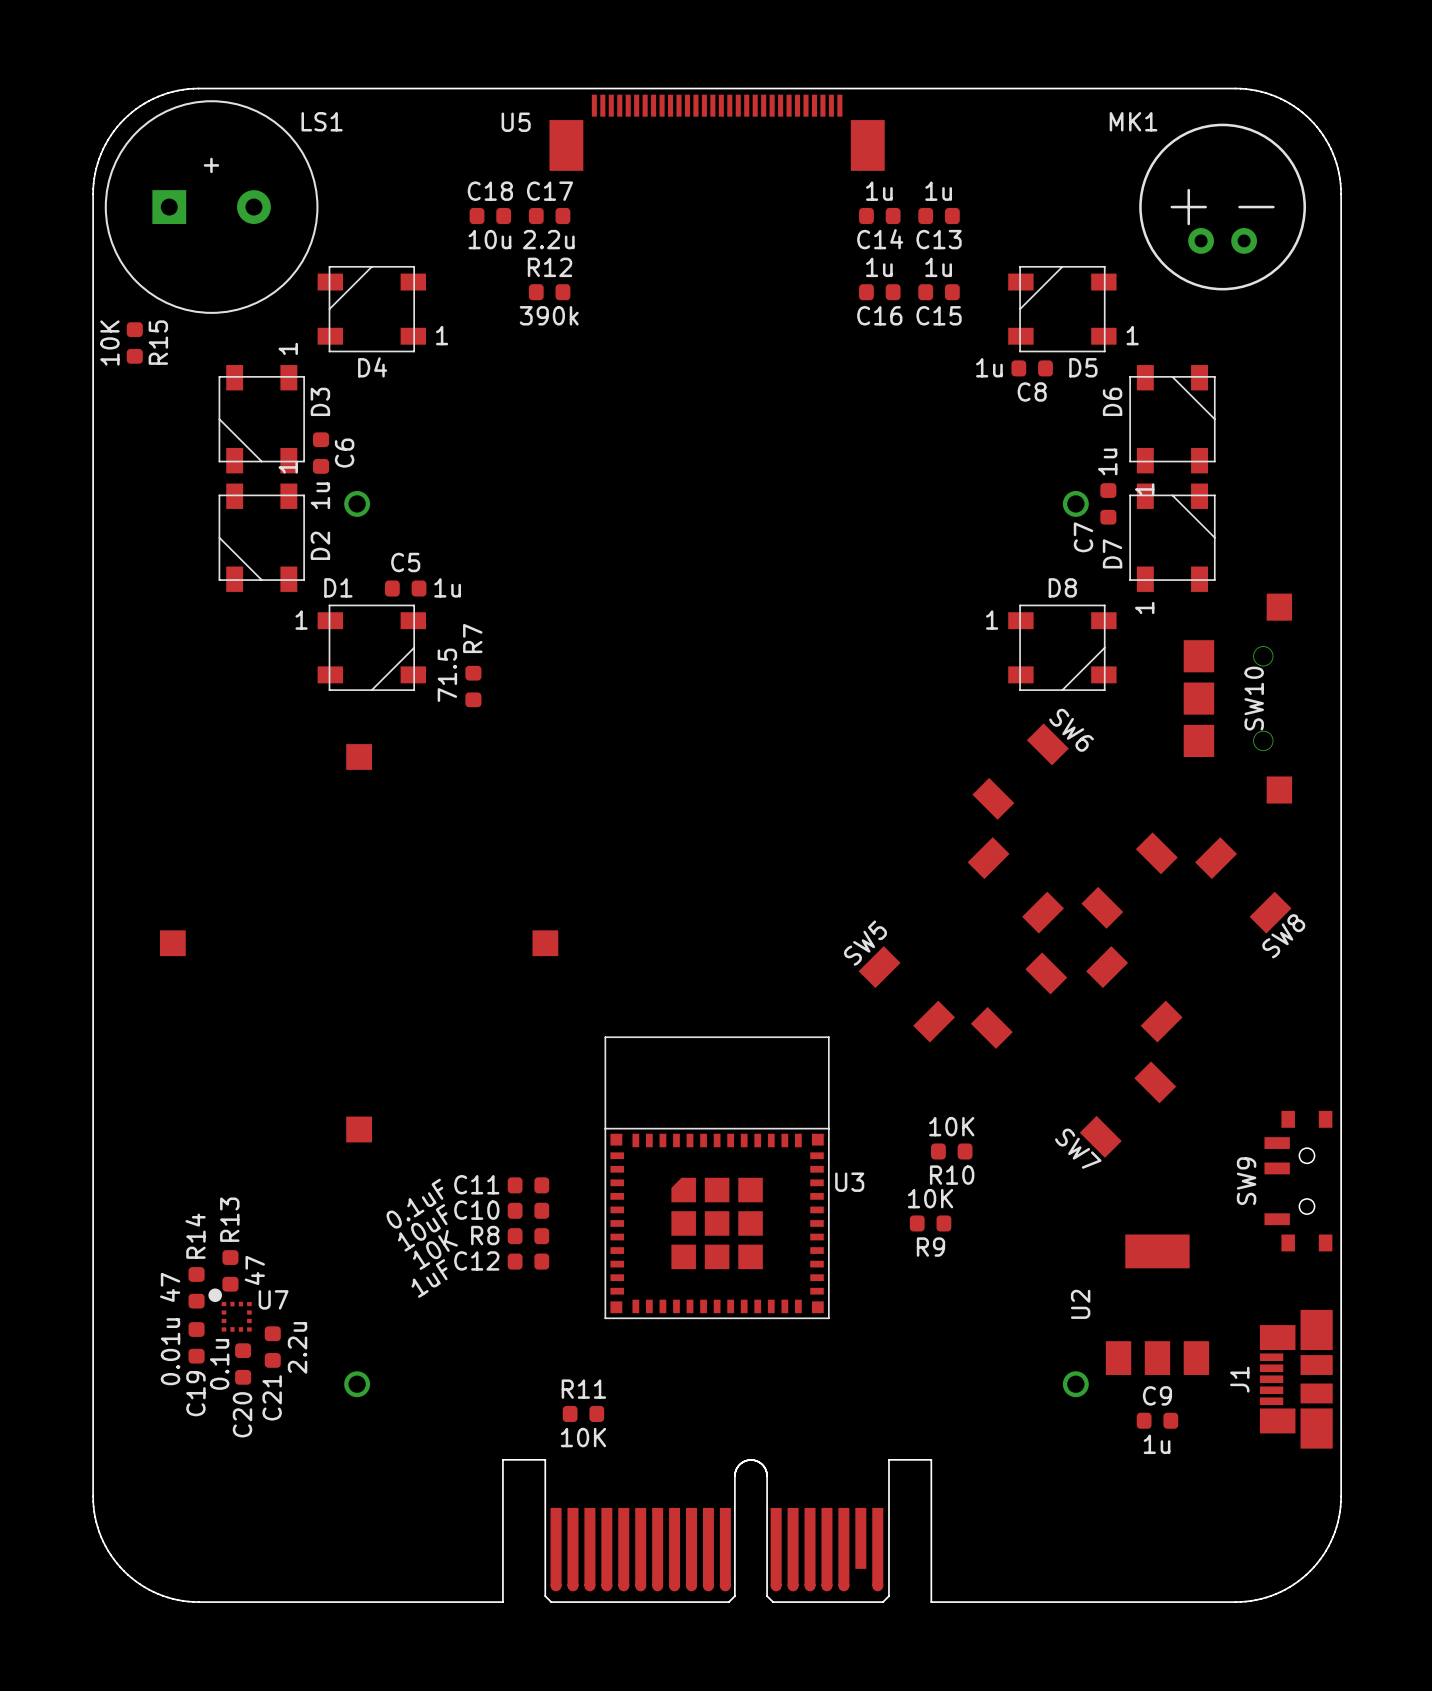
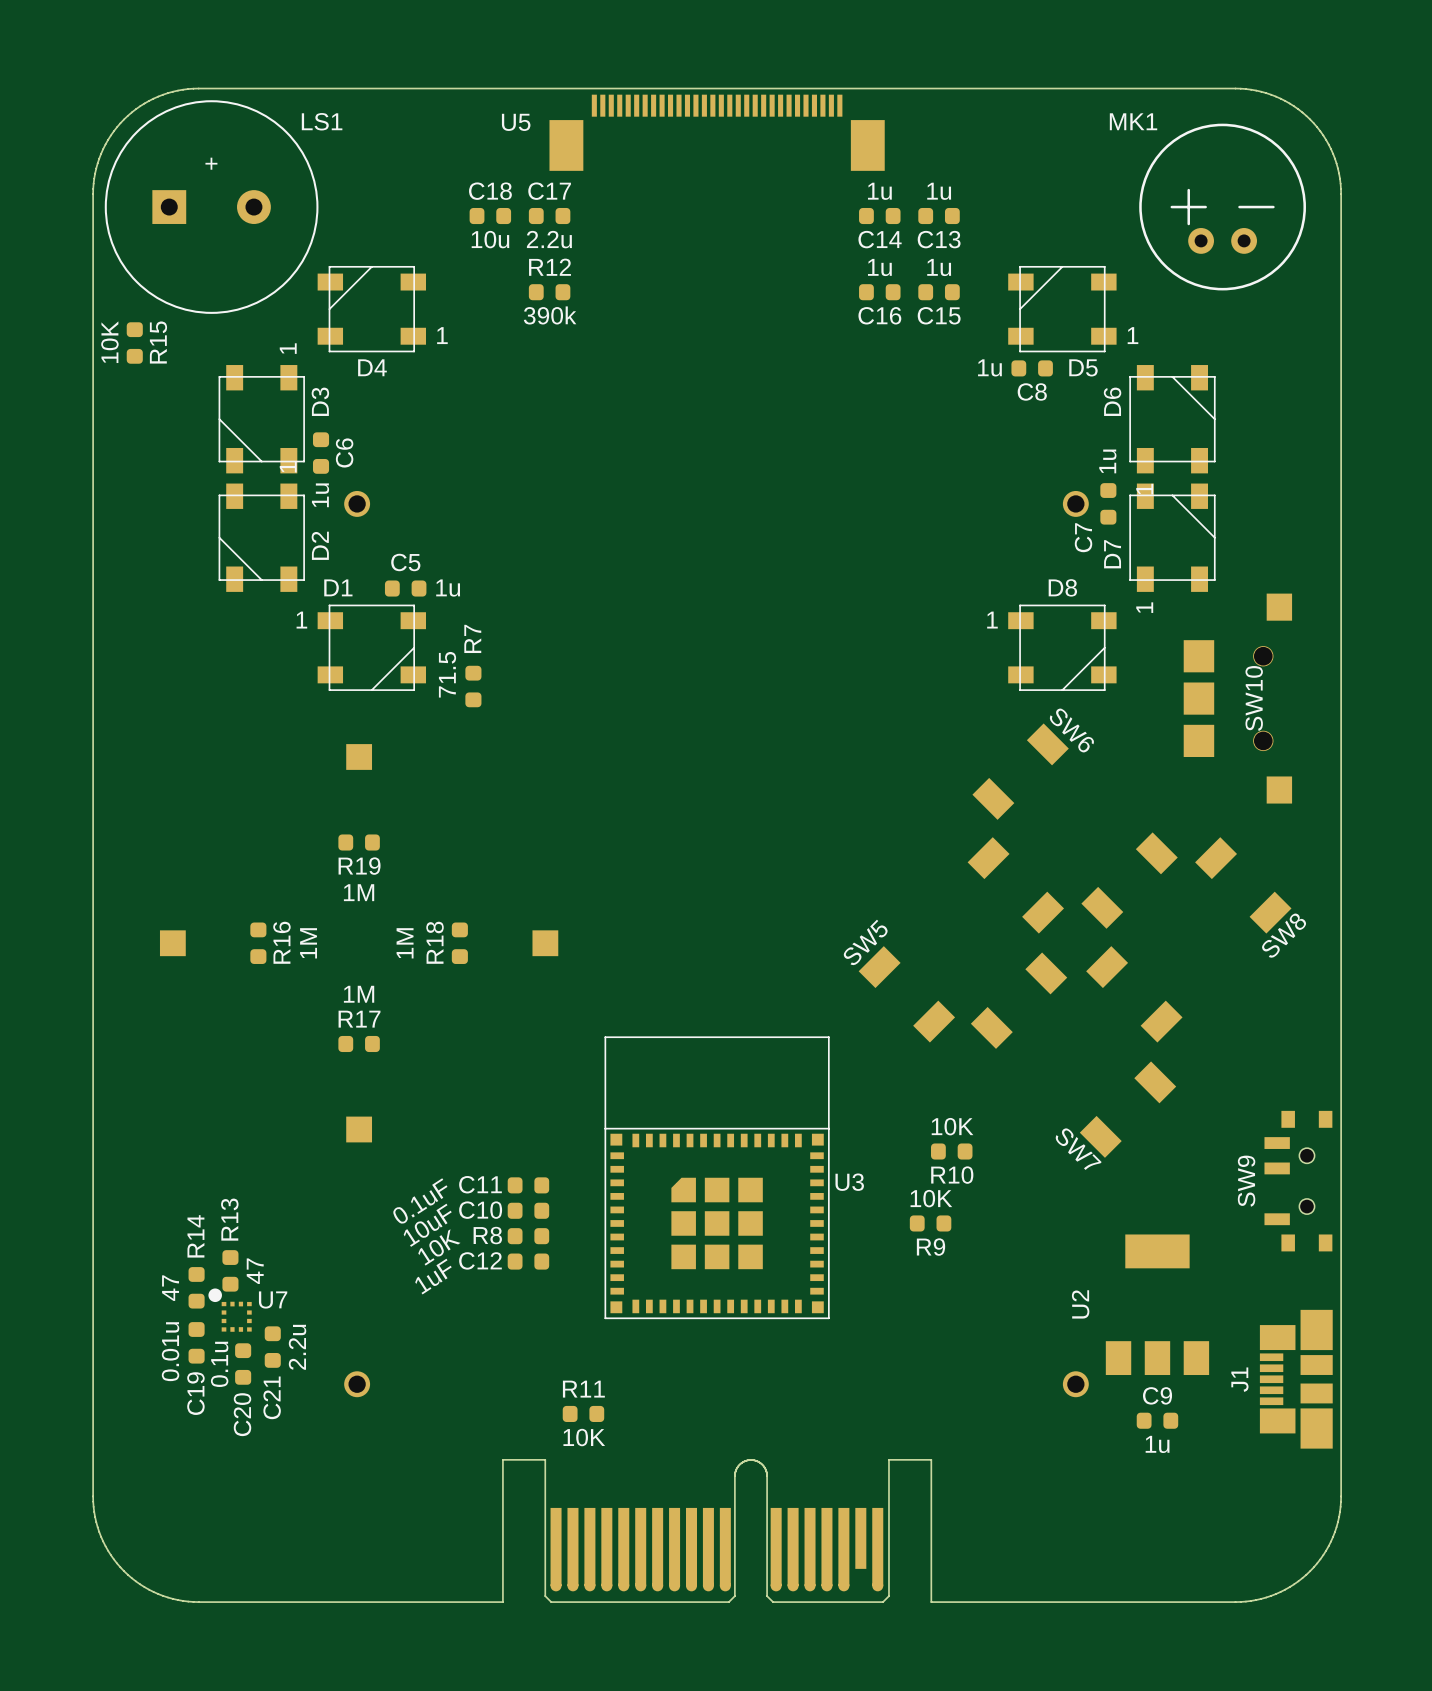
R19: none -> 1M (359, 842)
R16: none -> 1M (258, 943)
R18: none -> 1M (459, 943)
R17: none -> 1M (359, 1043)

